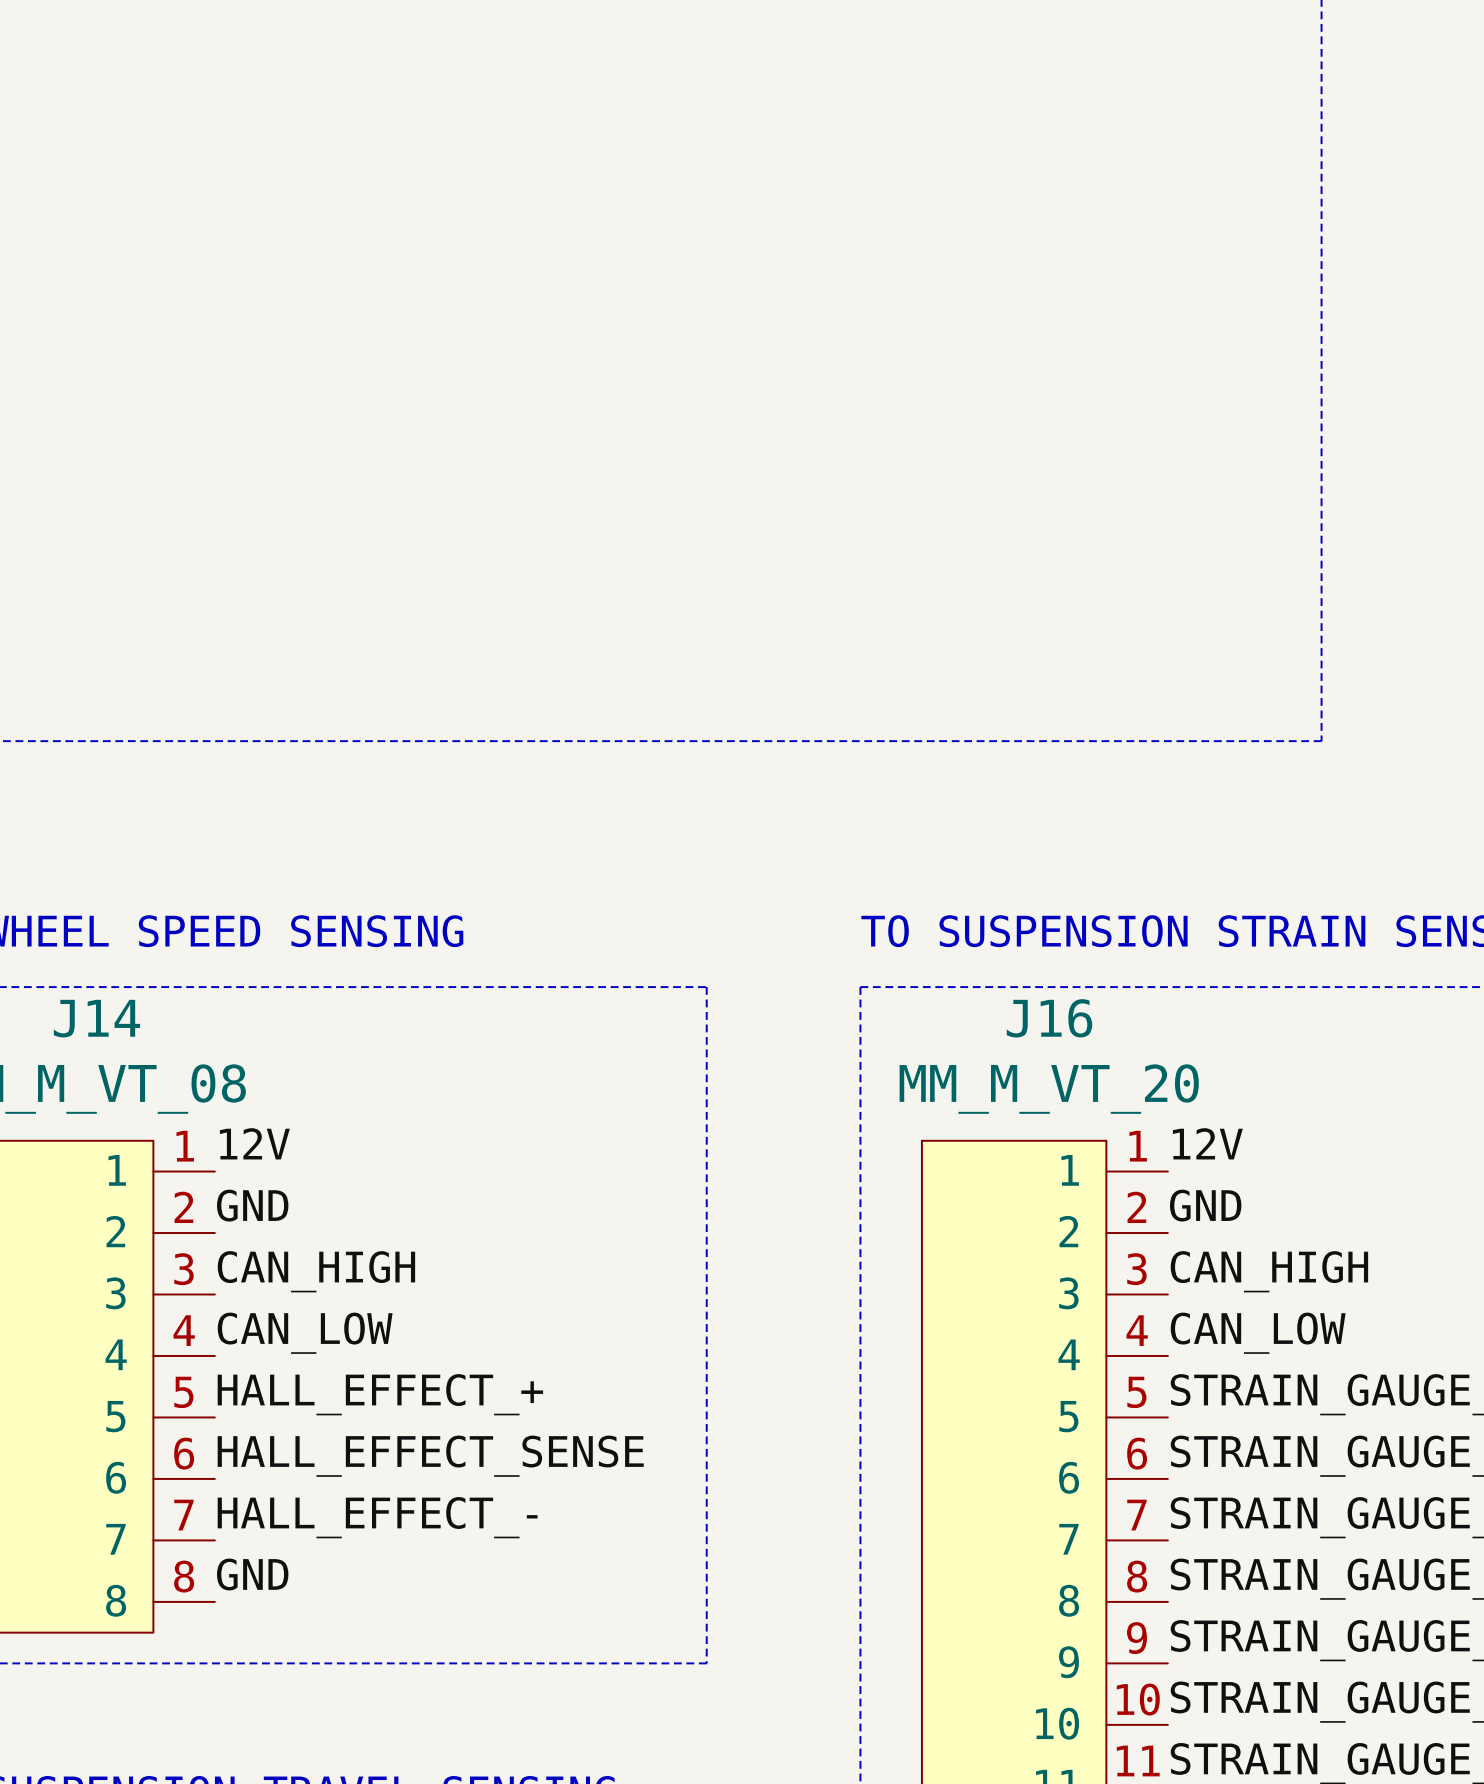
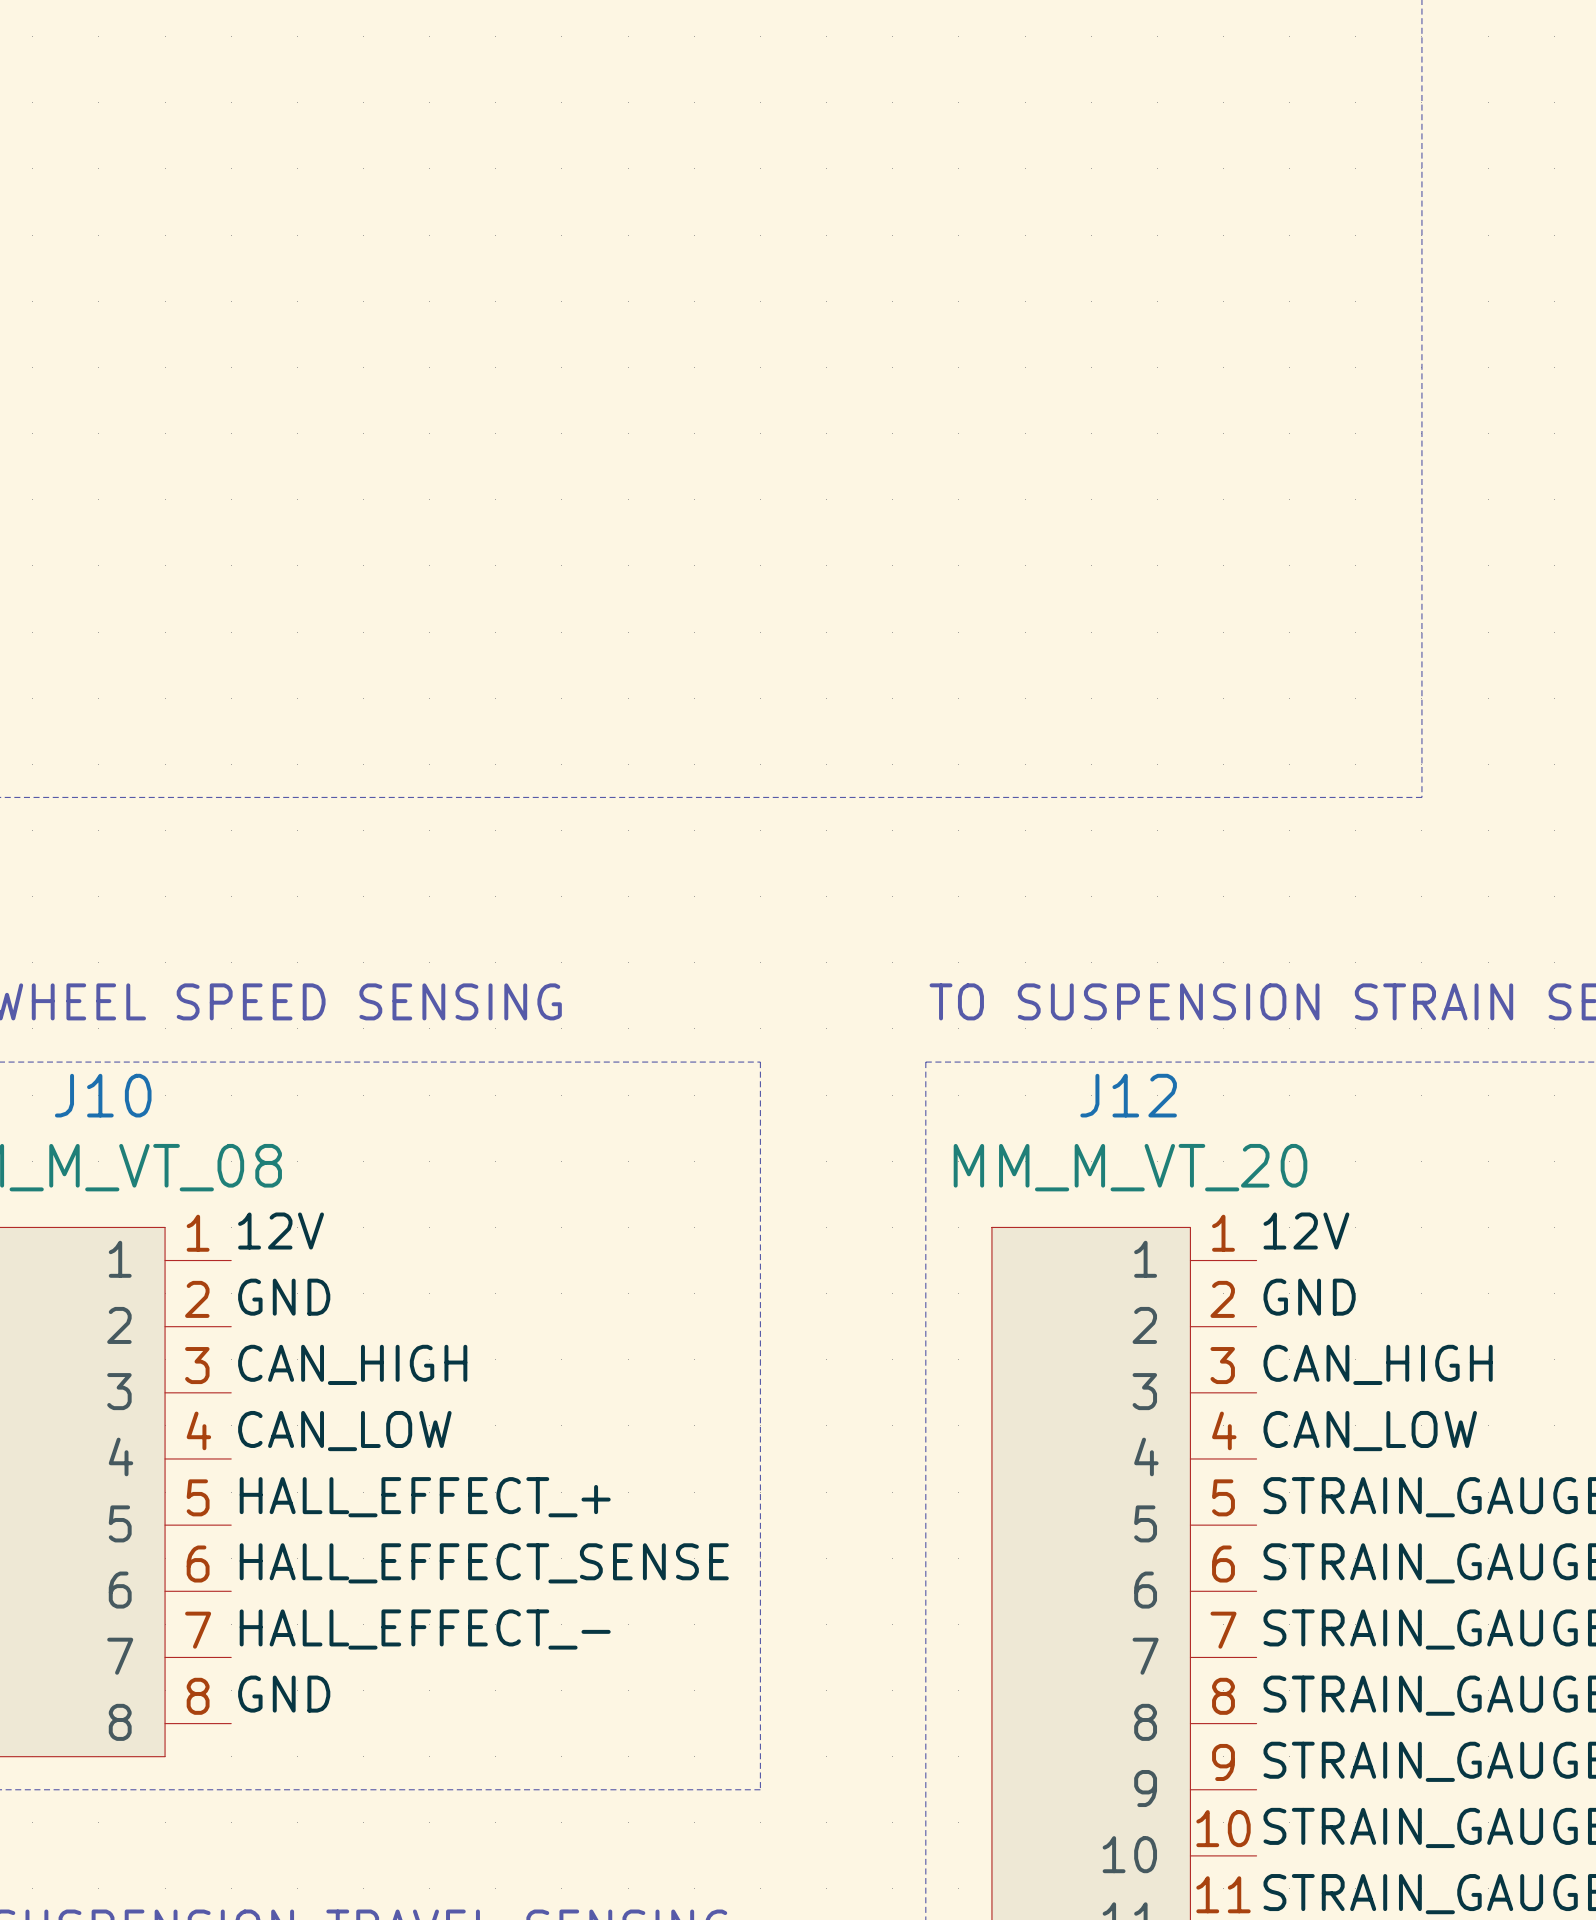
J14 name: J14 (96, 1018) -> J10 (103, 1095)
J16 name: J16 (1049, 1018) -> J12 (1128, 1095)

